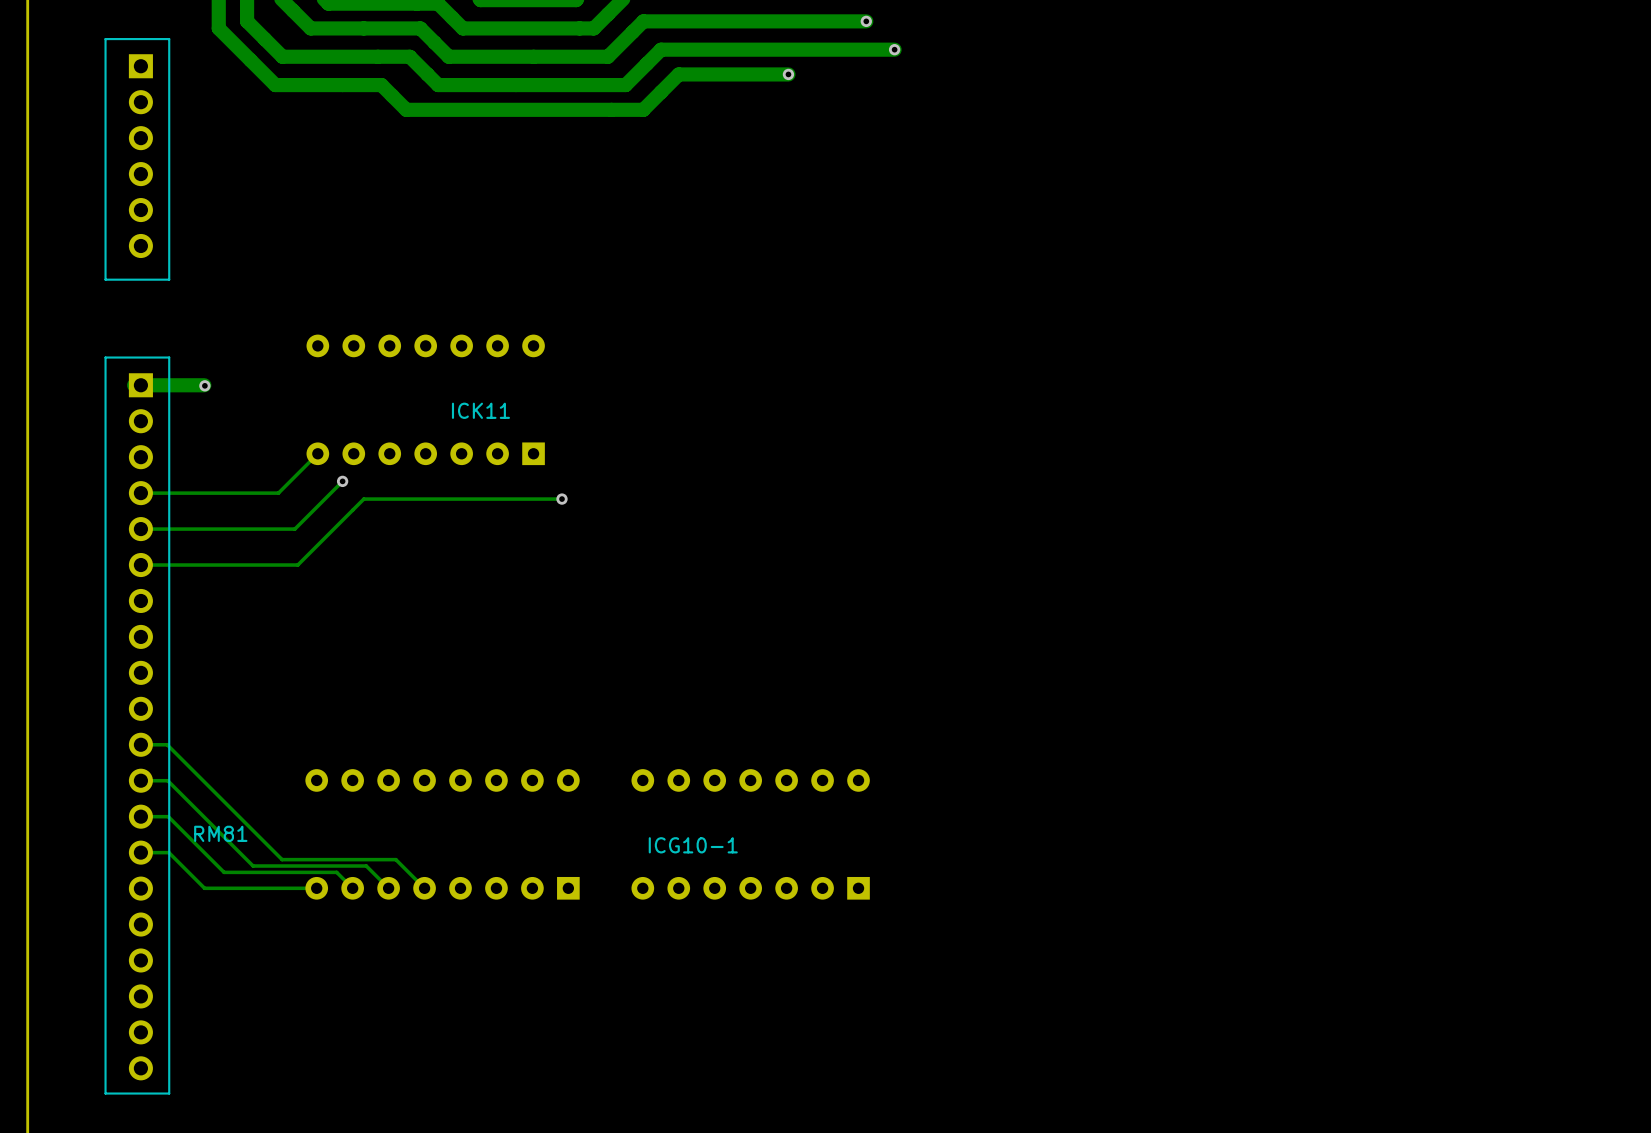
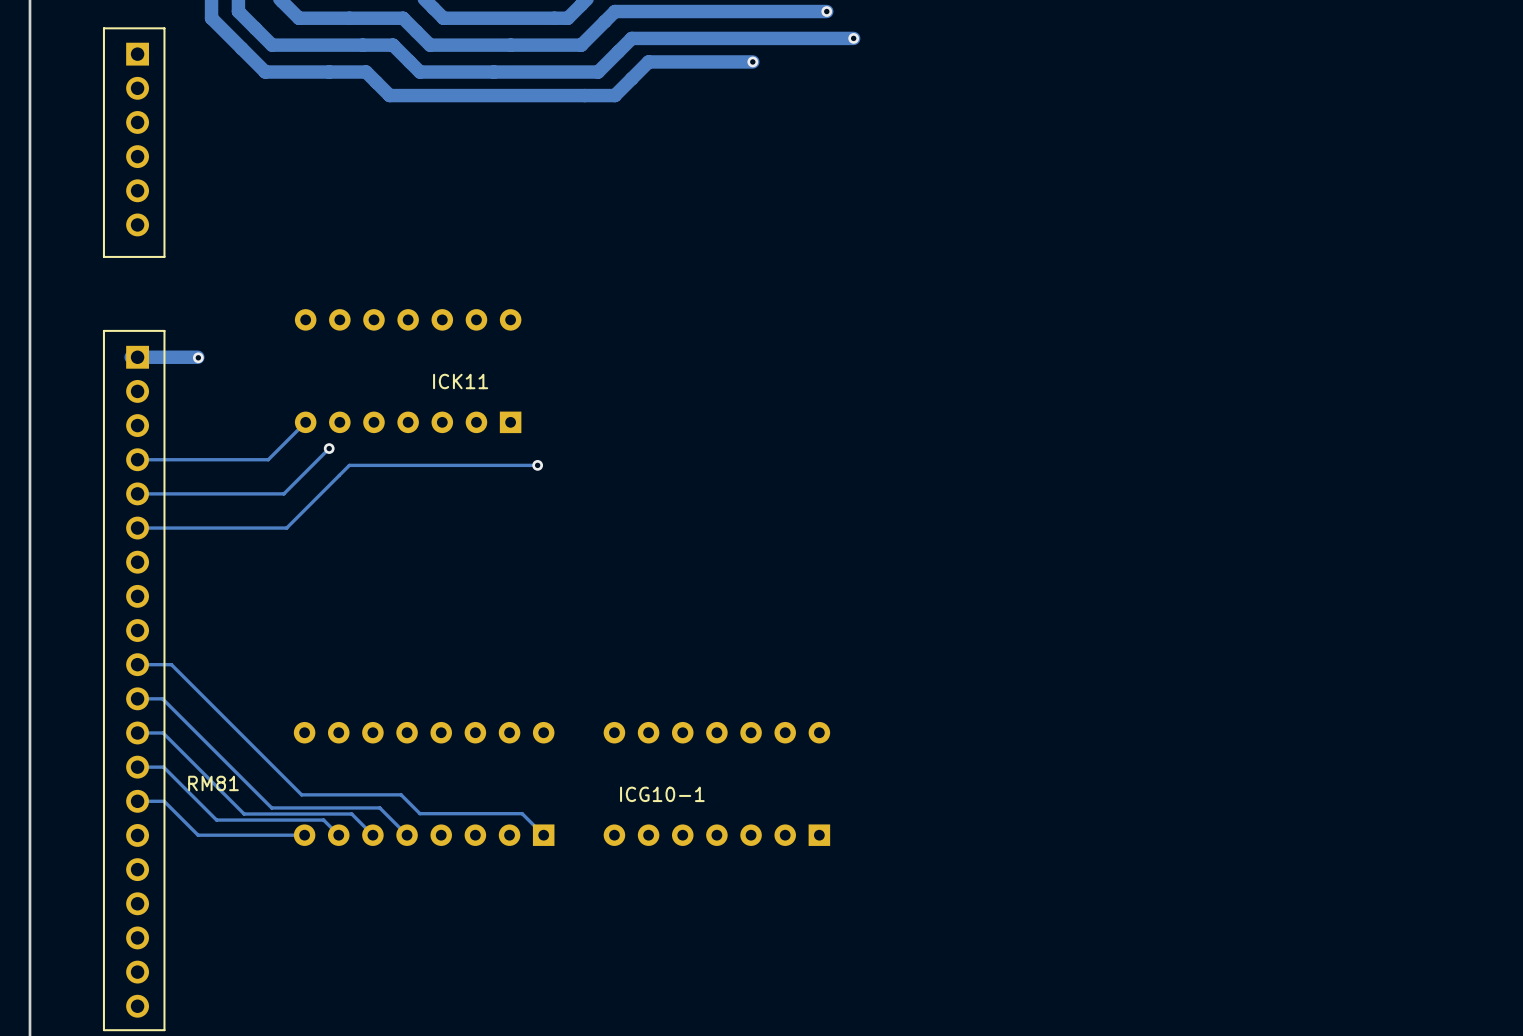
bottom track: none -> (137, 664) (171, 664) (301, 794) (401, 794) (419, 813) (522, 813) (543, 835)

